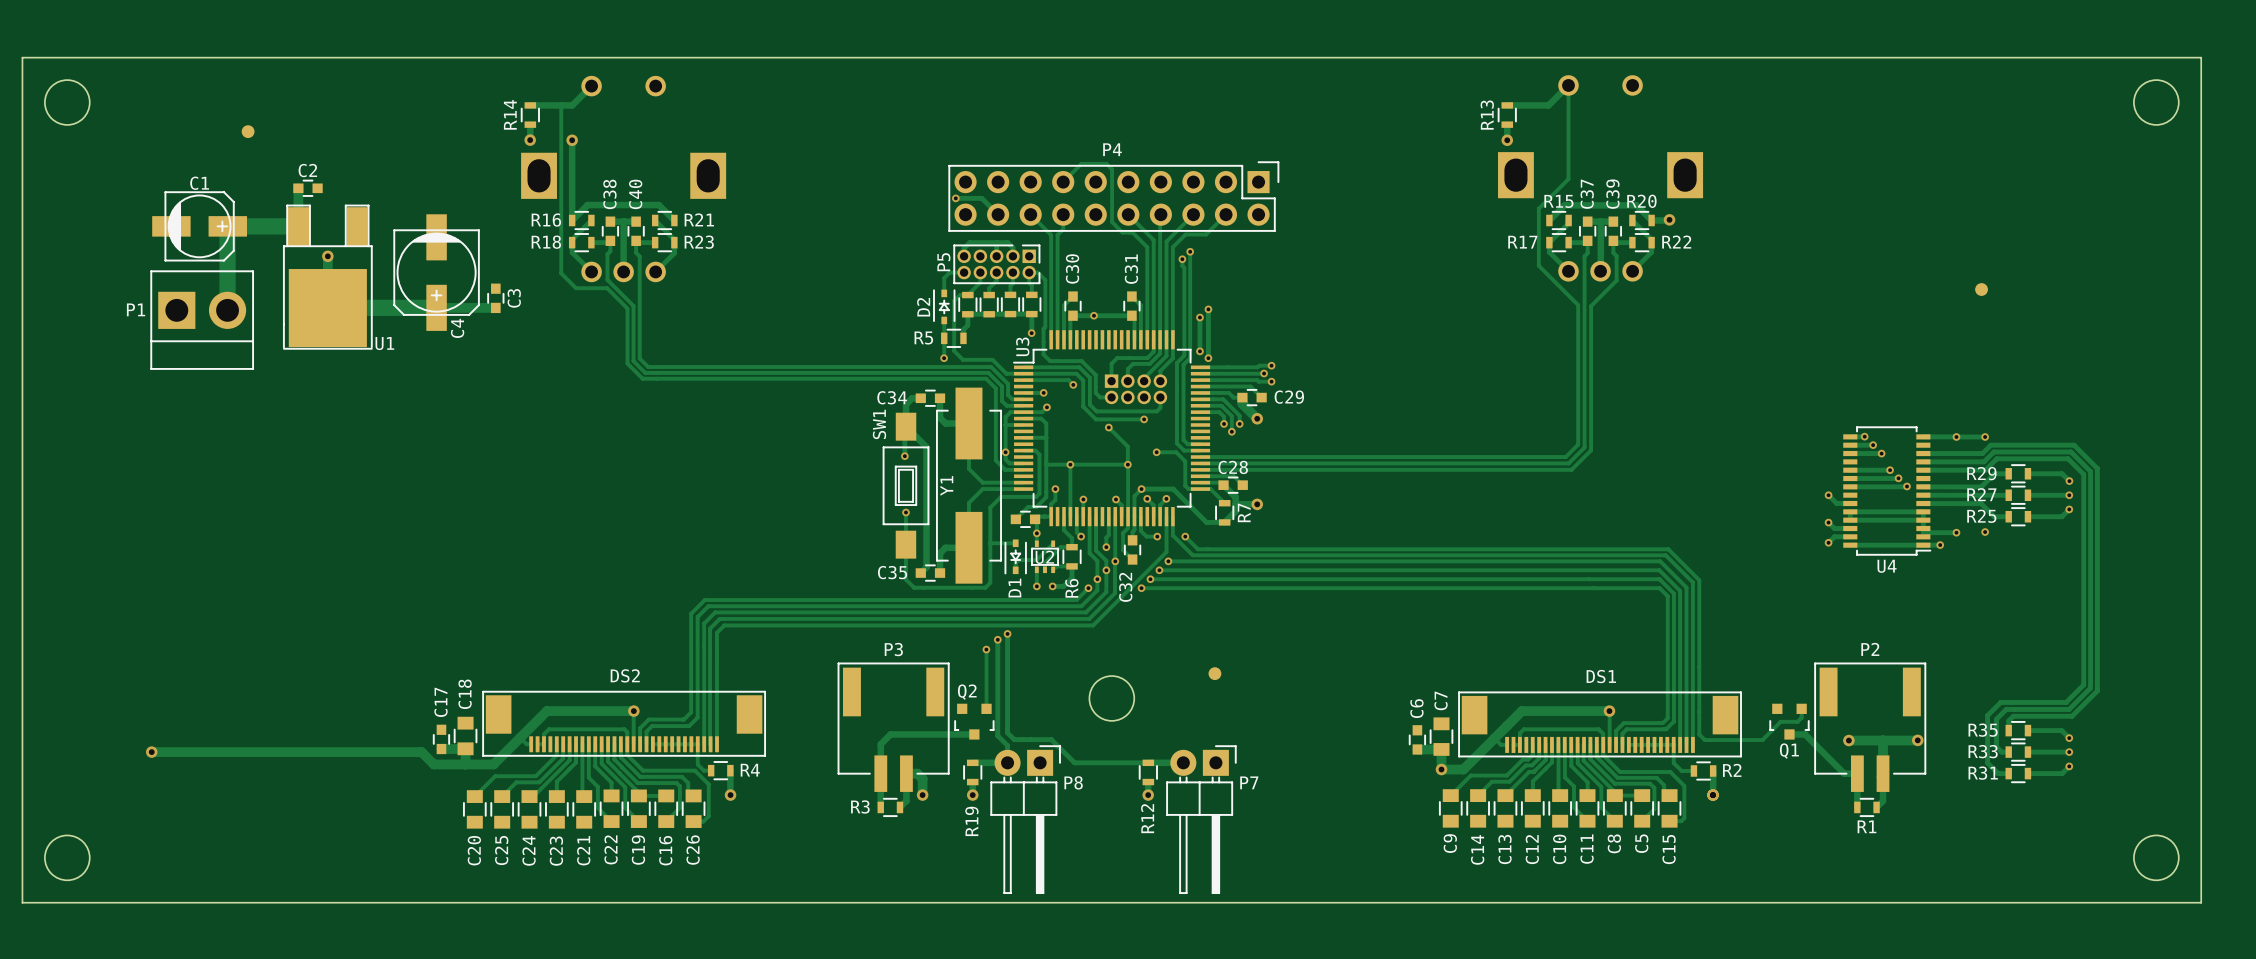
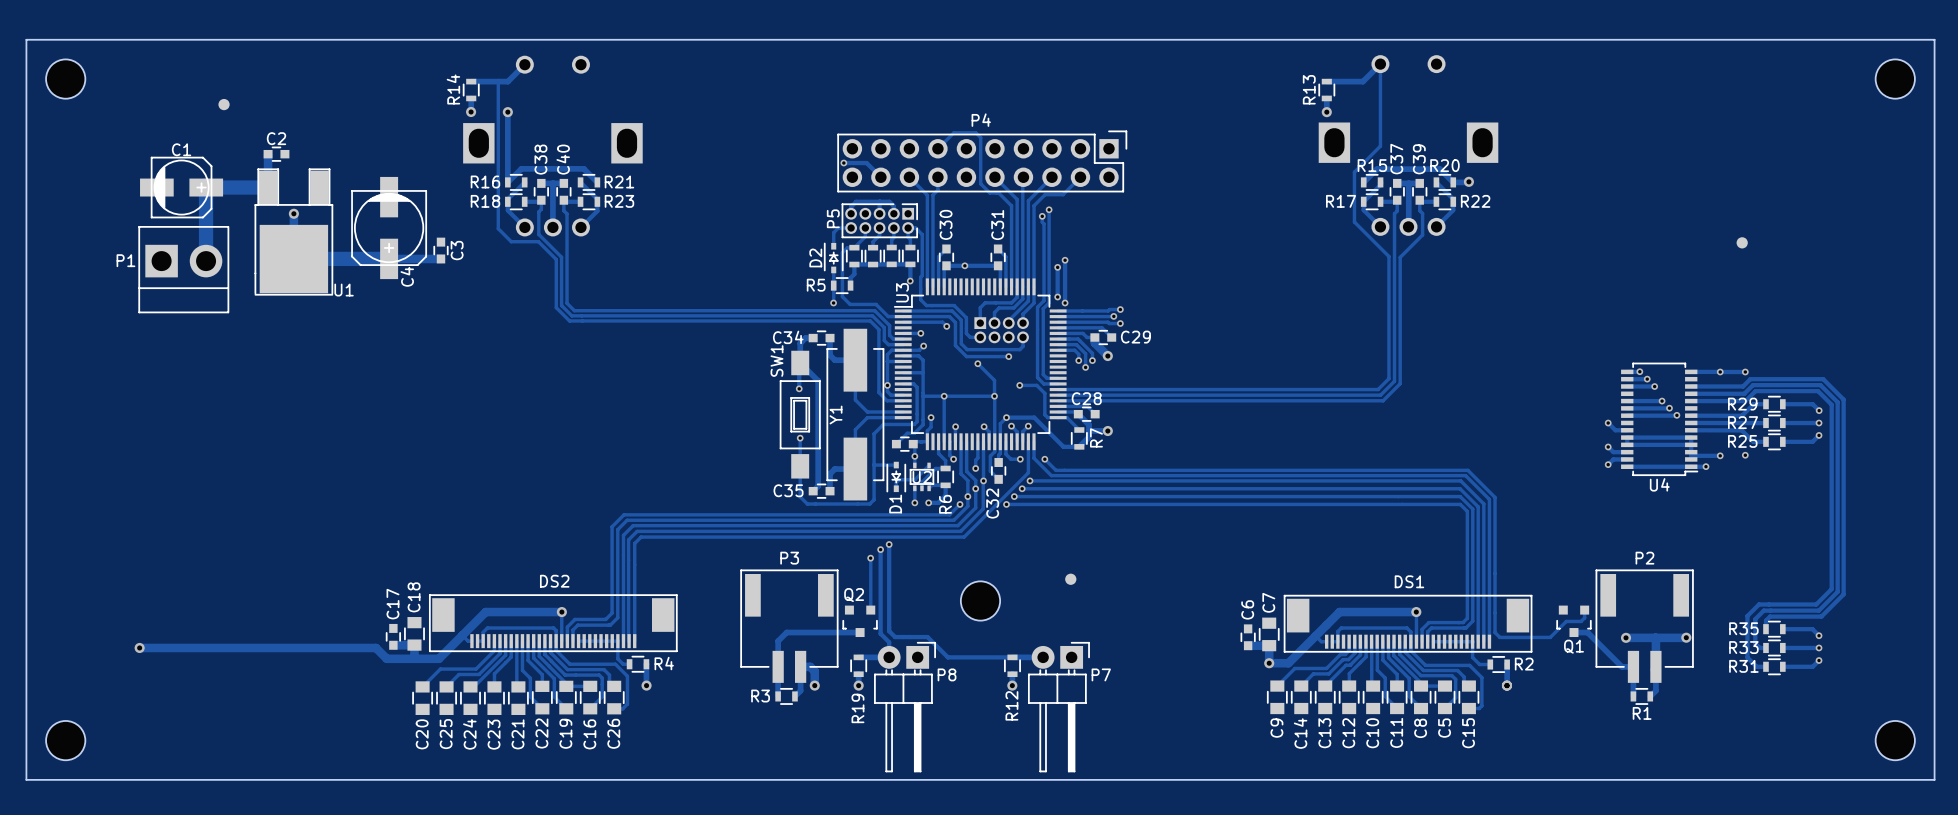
part: none -> (65, 79)
part: none -> (1895, 79)
part: none -> (980, 600)
part: none -> (65, 740)
part: none -> (1895, 740)

